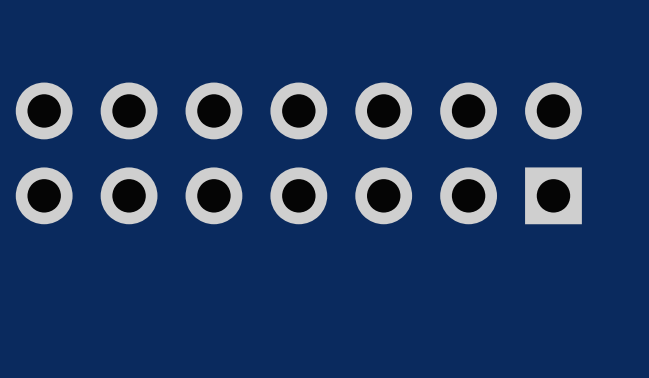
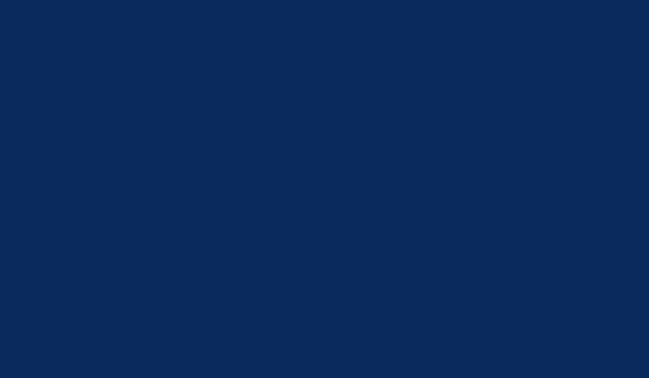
part: (298, 153) -> none

